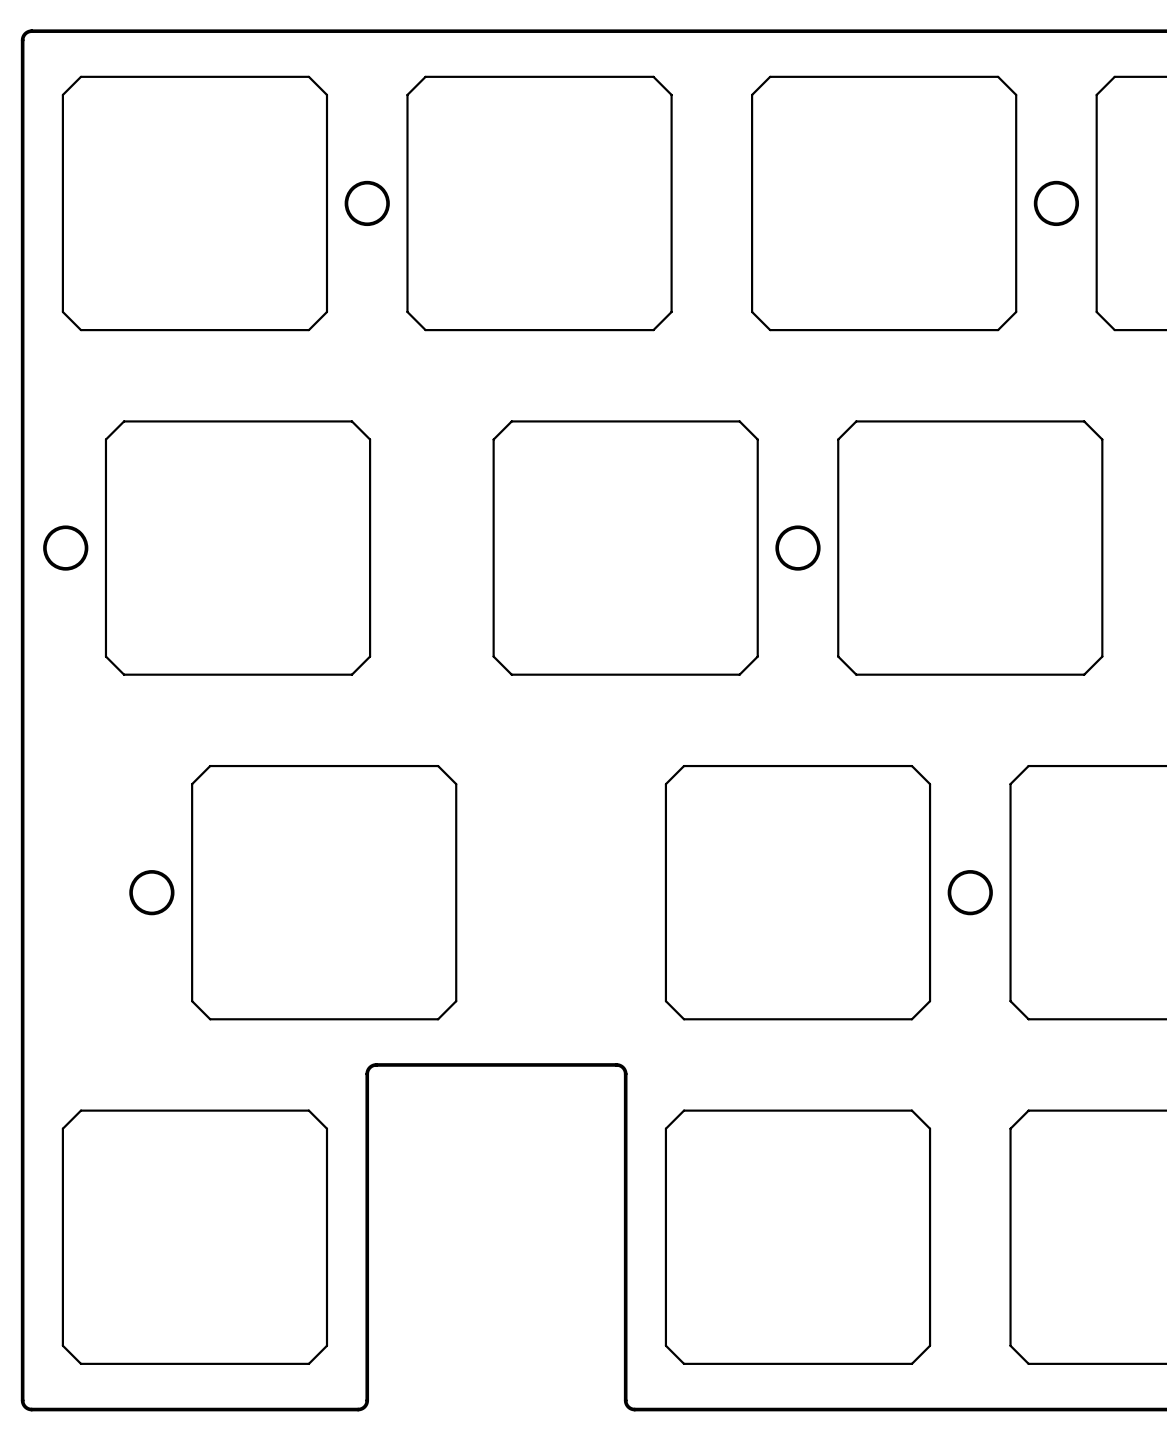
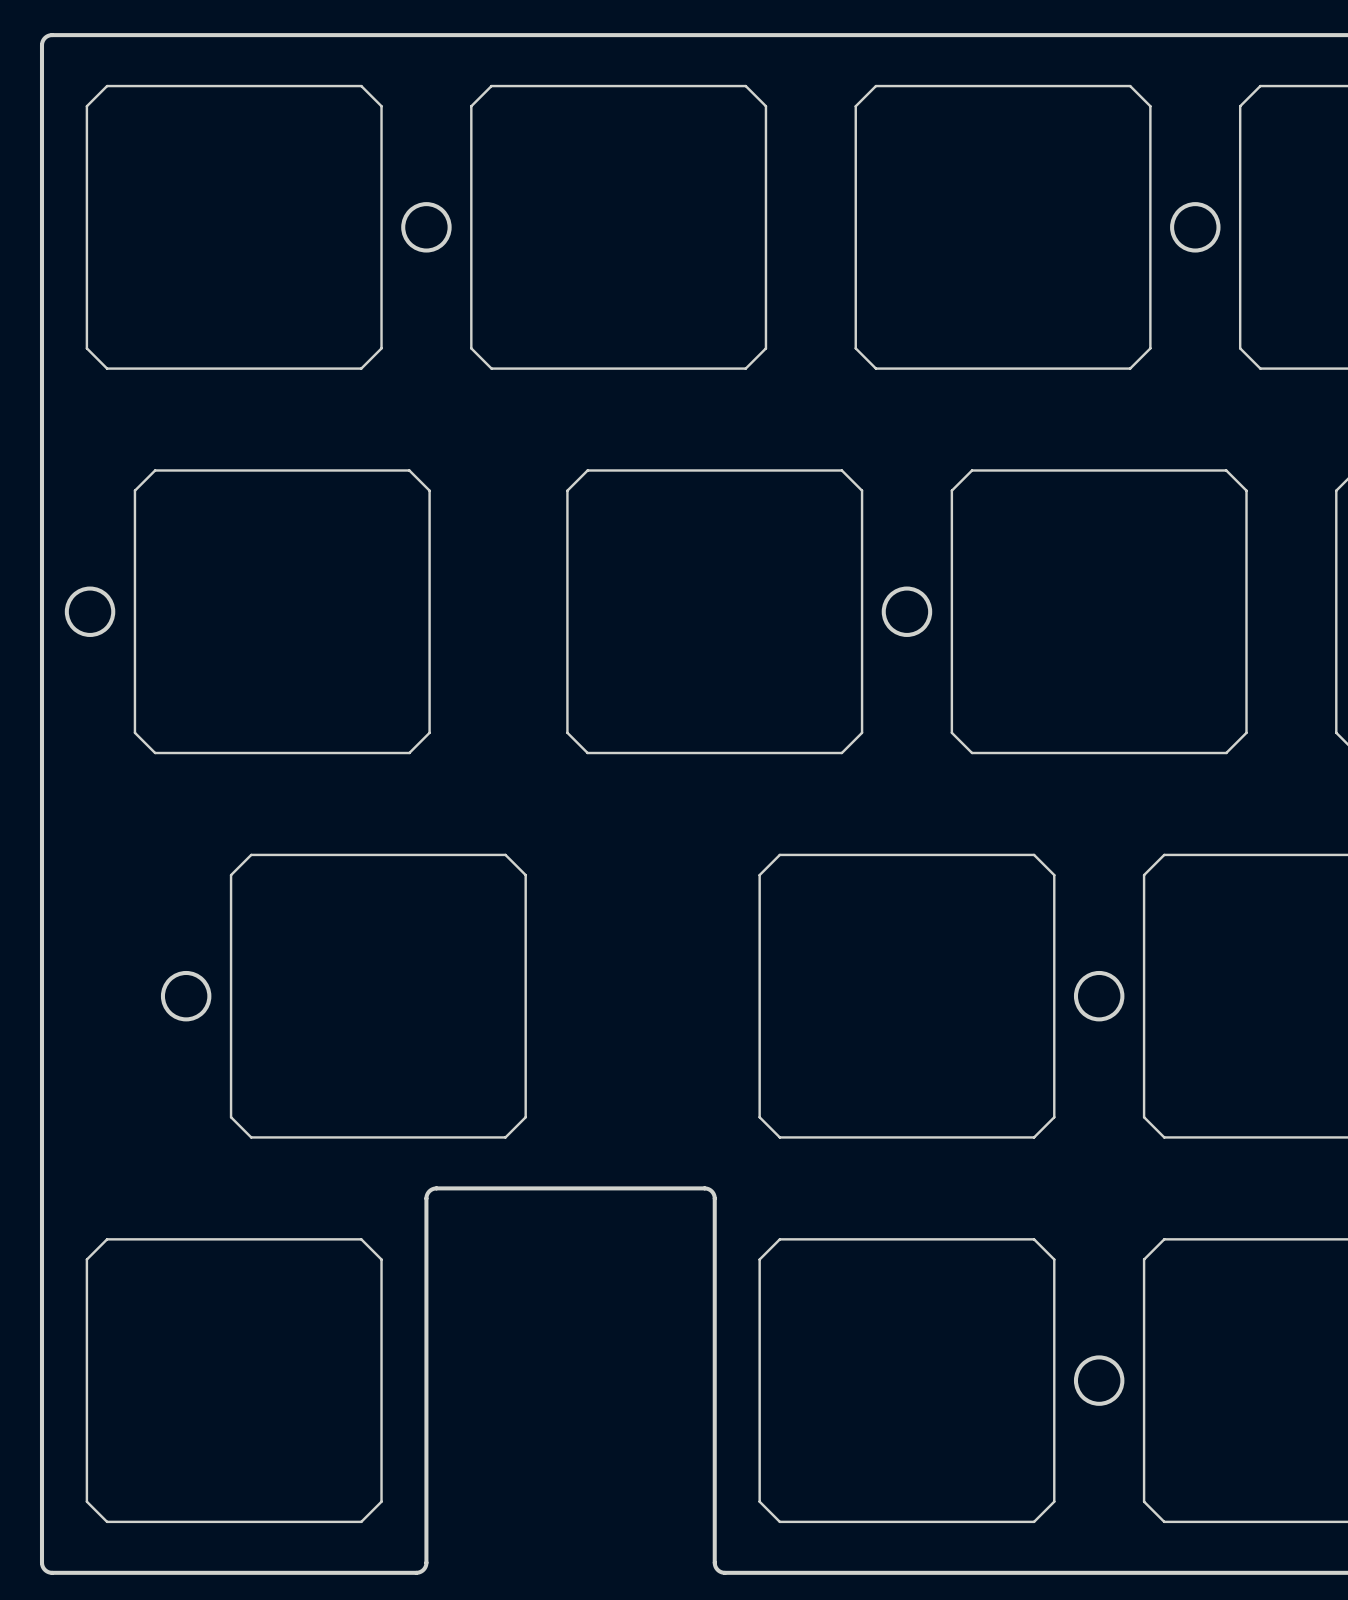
round board edge: none -> [1073, 1355, 1125, 1406]

